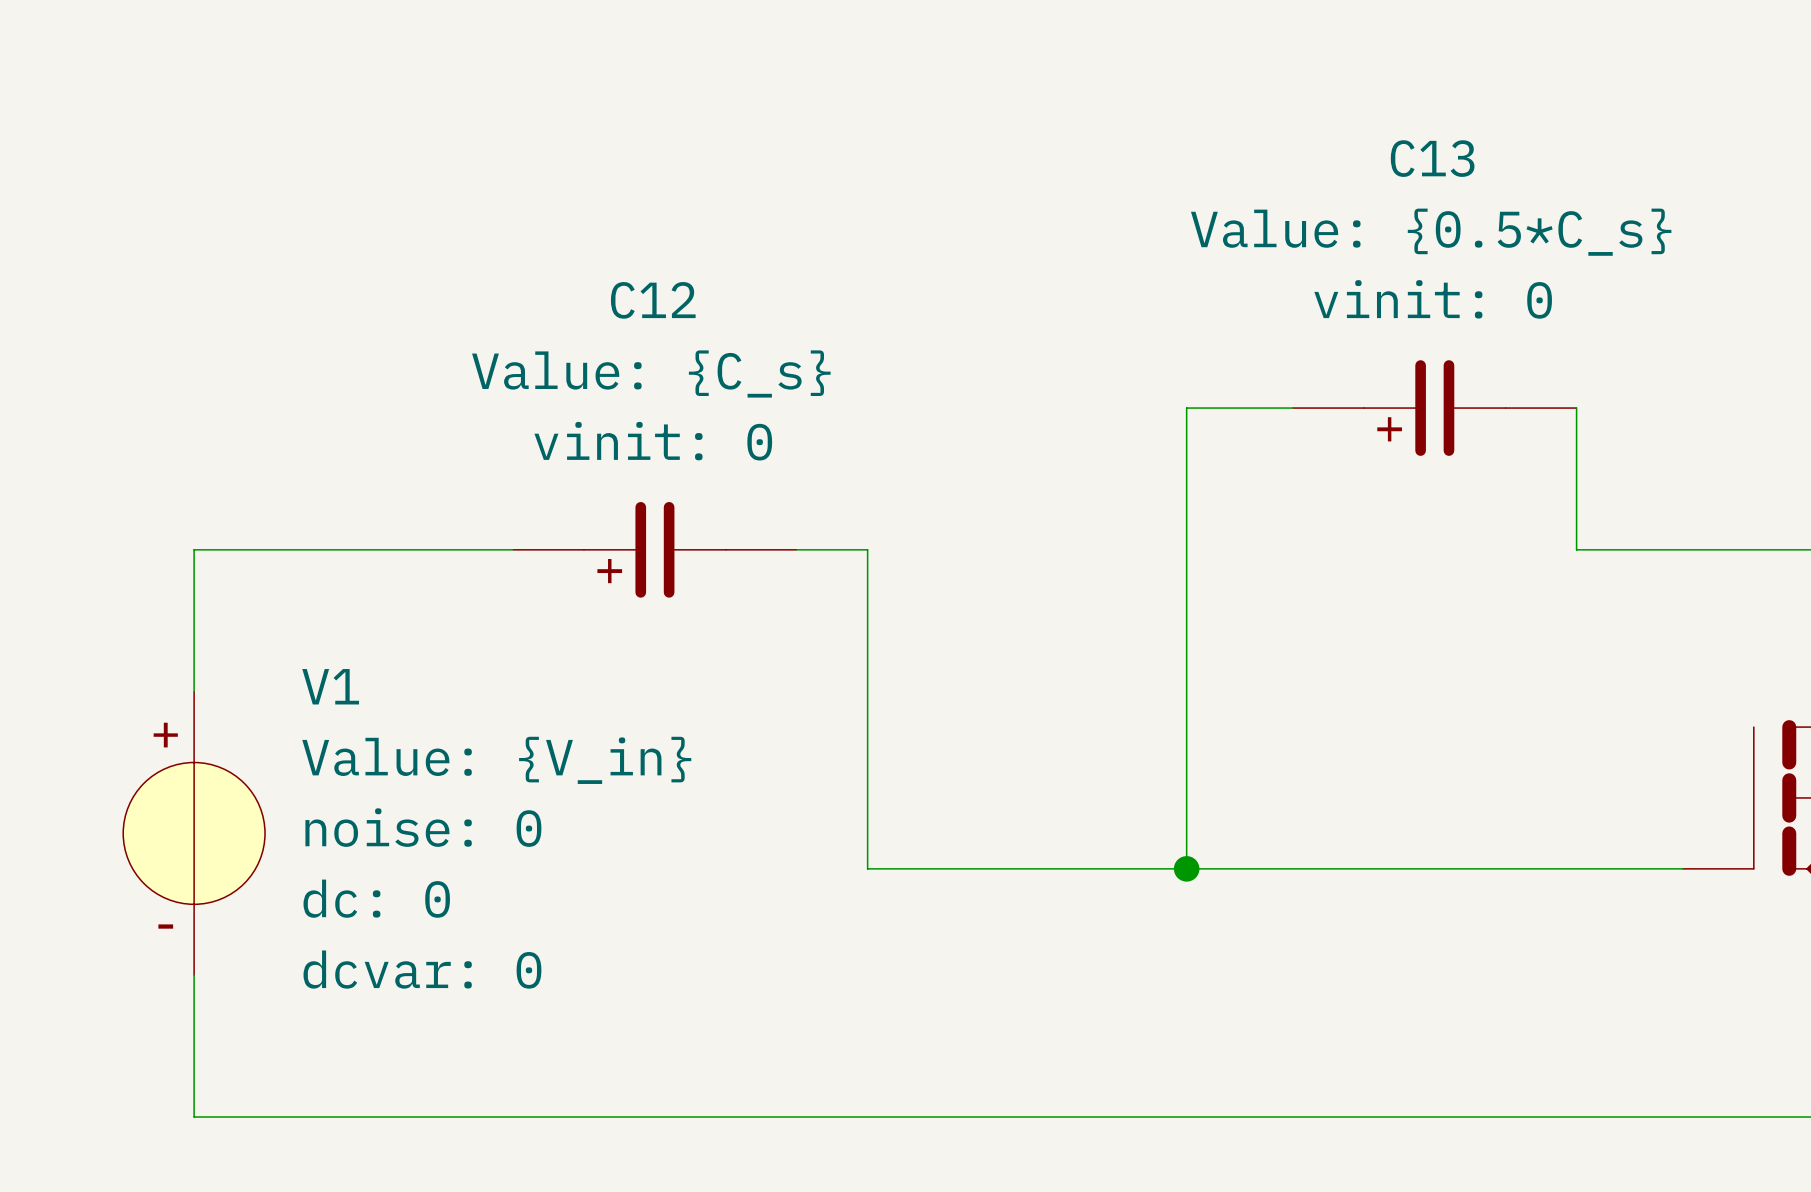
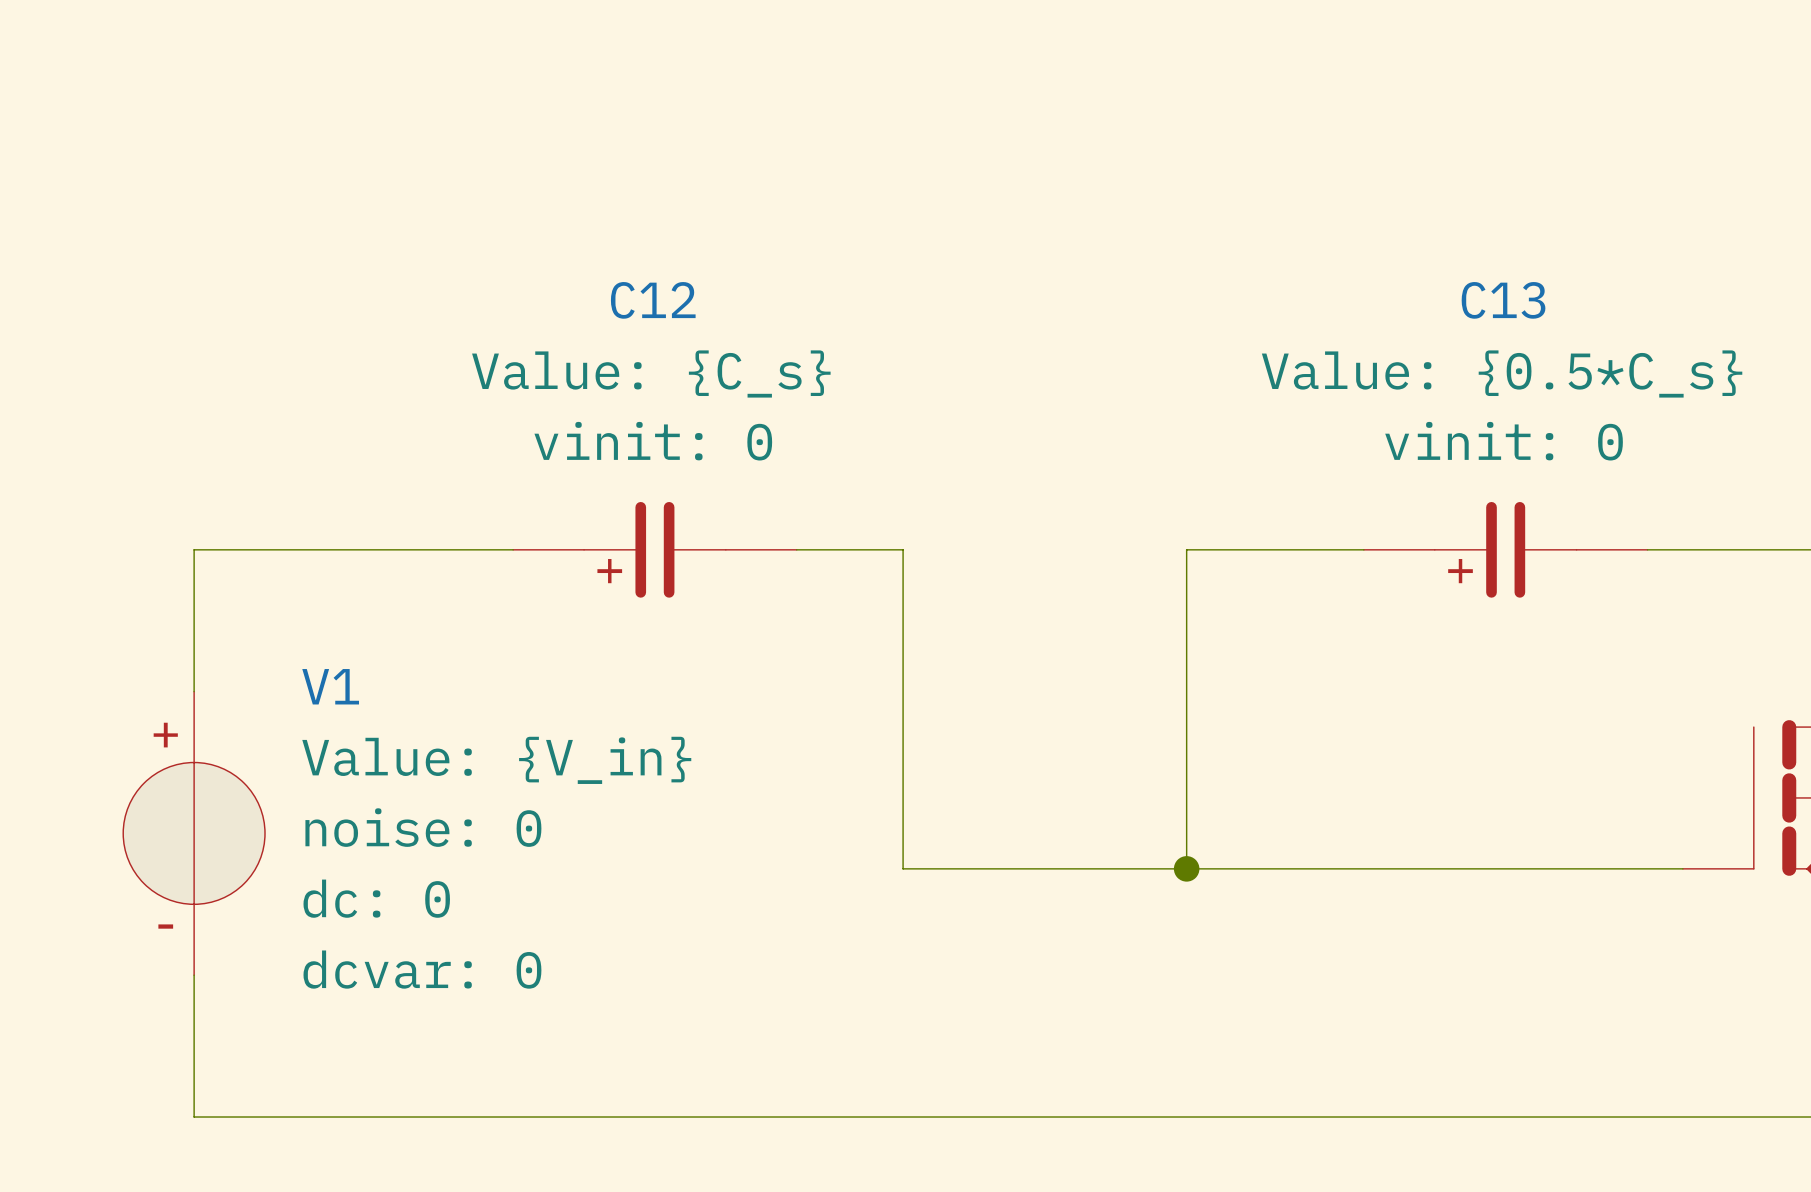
wire: (1293, 408) (1186, 408) (1186, 549) -> (1363, 549) (1186, 549)
C13 position: (1434, 408) -> (1505, 549)
wire: (1576, 408) (1576, 549) (1647, 549) -> none
wire: (867, 549) (867, 868) (903, 868) -> (867, 549) (903, 549) (903, 868)

